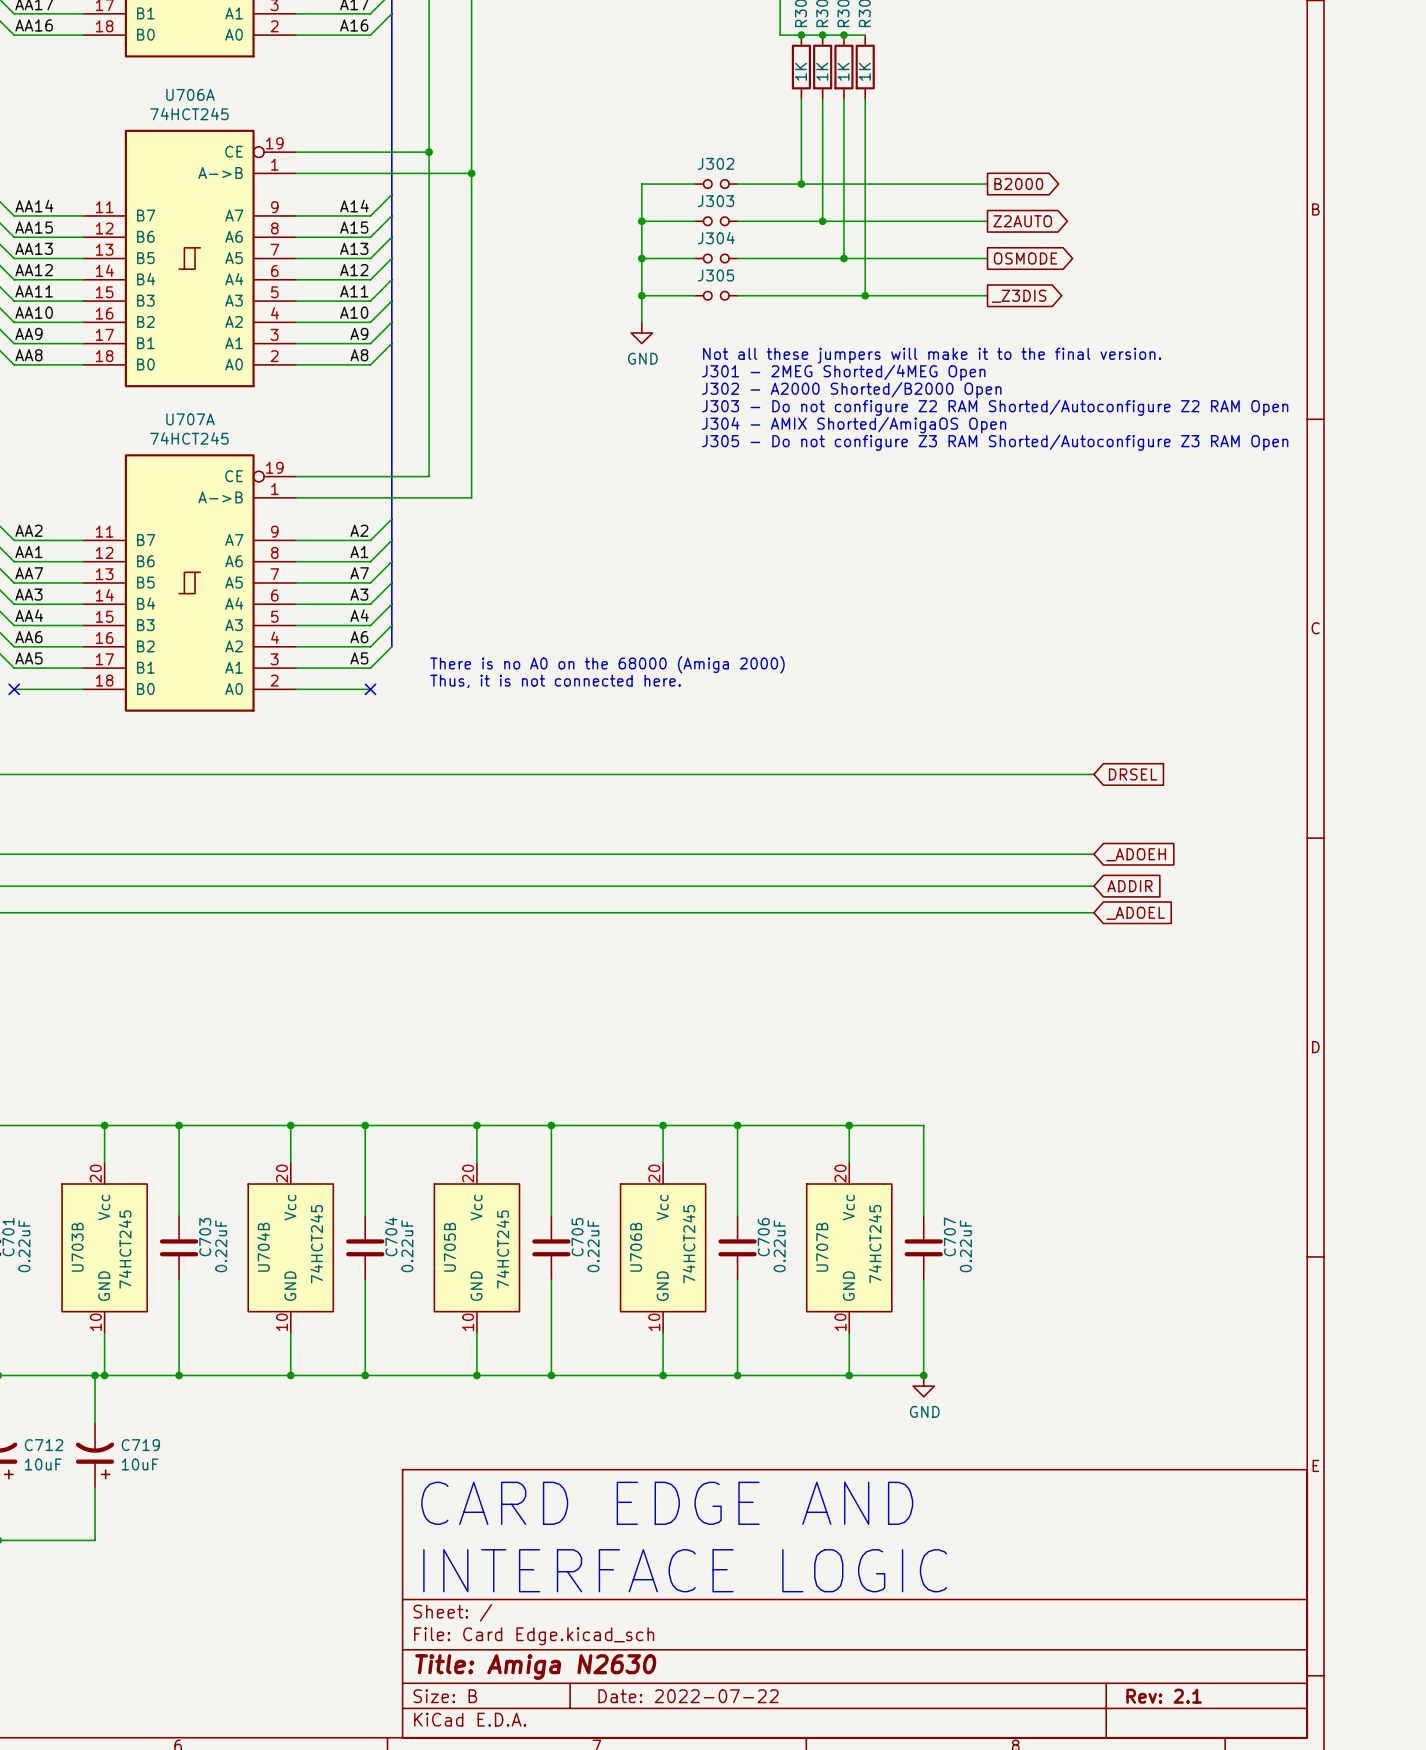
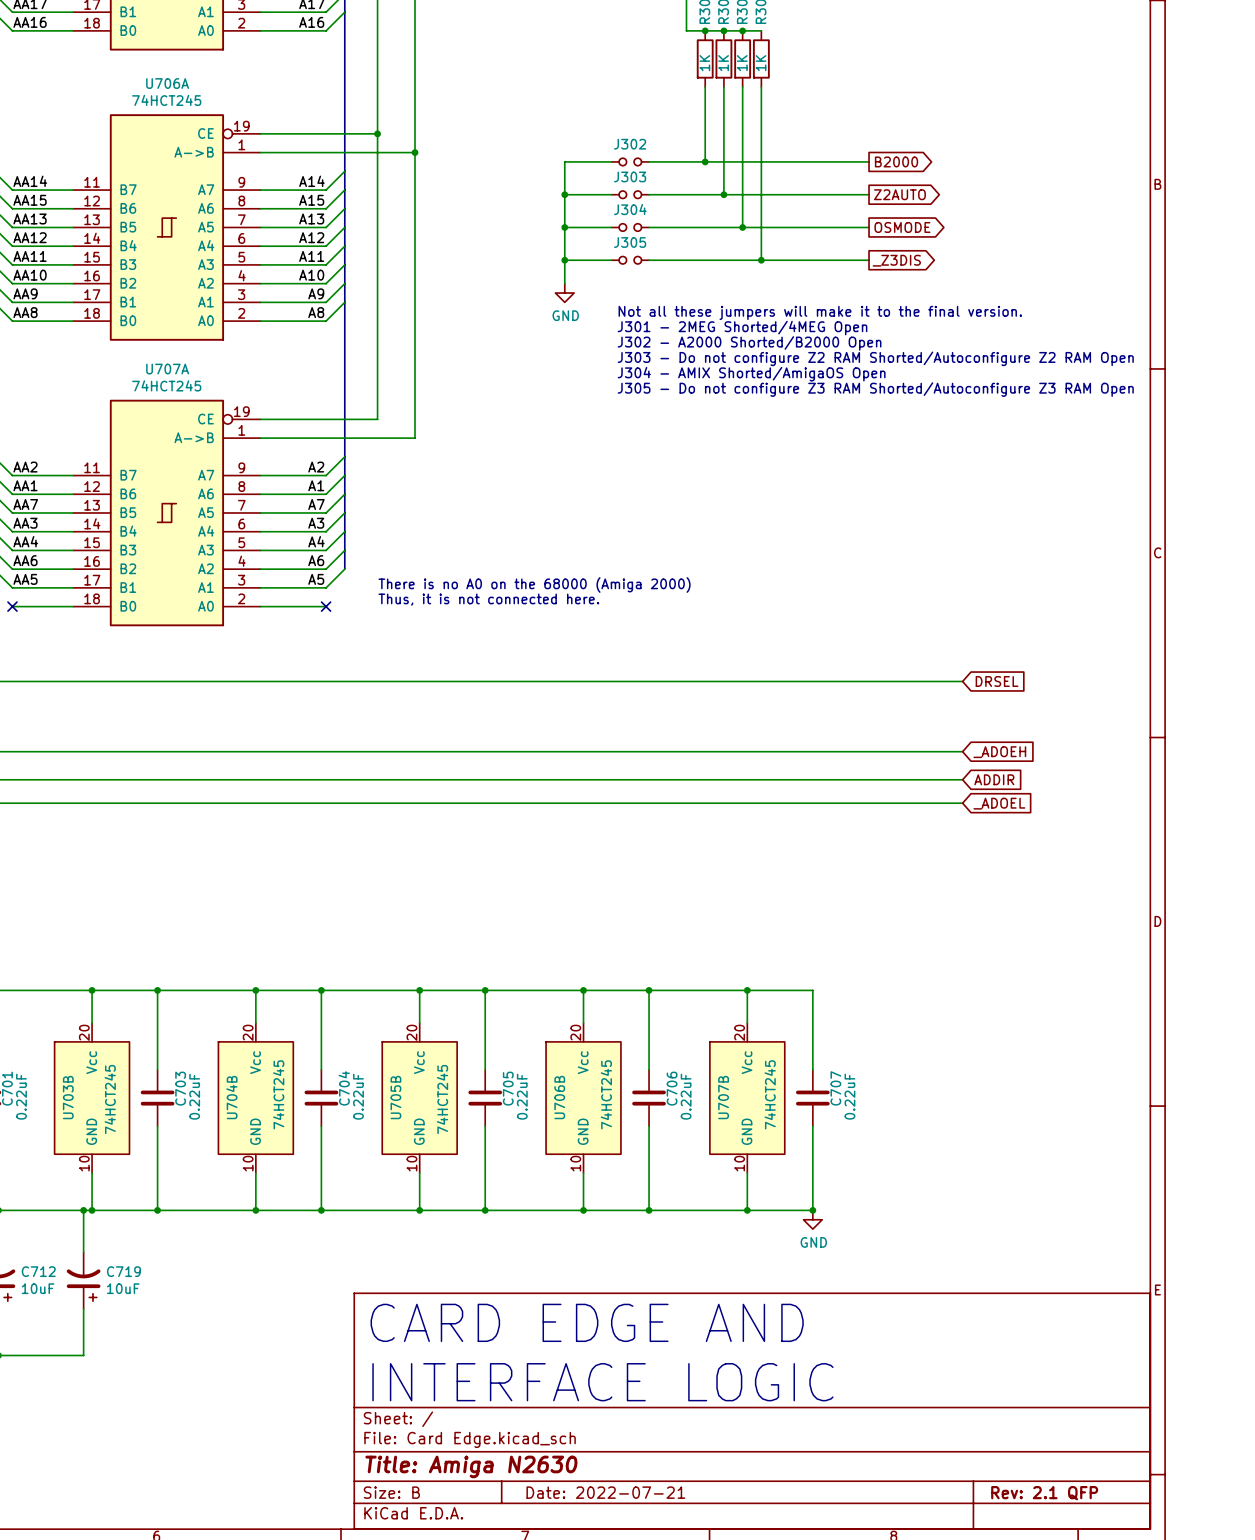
title block: Date: 2022-07-22 (688, 1696) -> Date: 2022-07-21 (605, 1492)
title block: Rev: 2.1 (1164, 1696) -> Rev: 2.1 QFP (1044, 1493)

